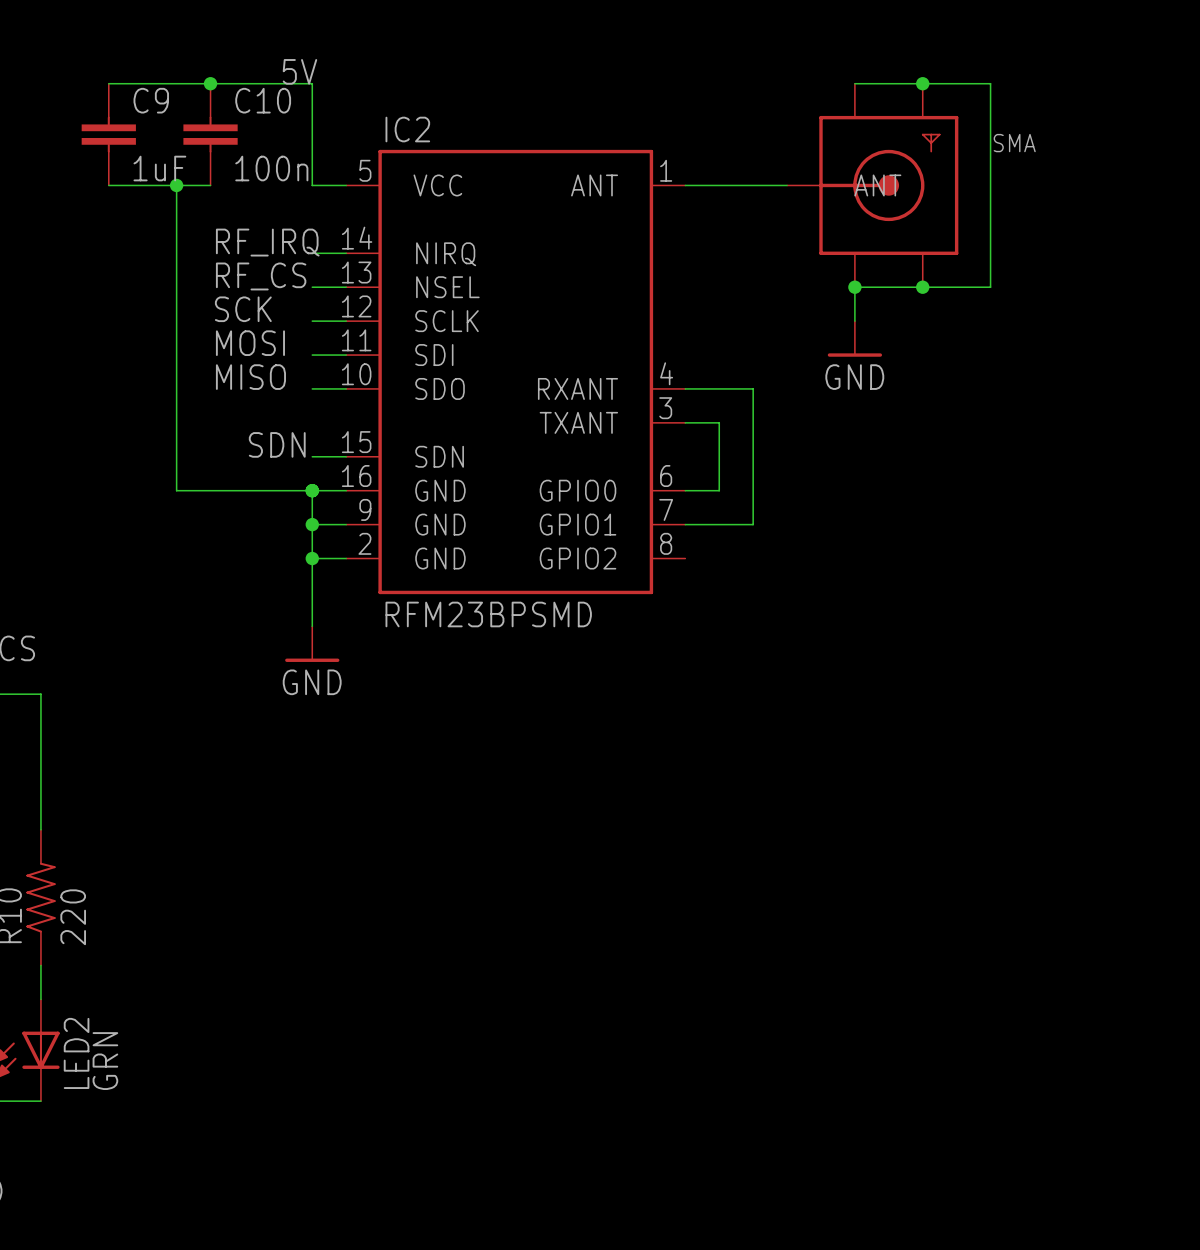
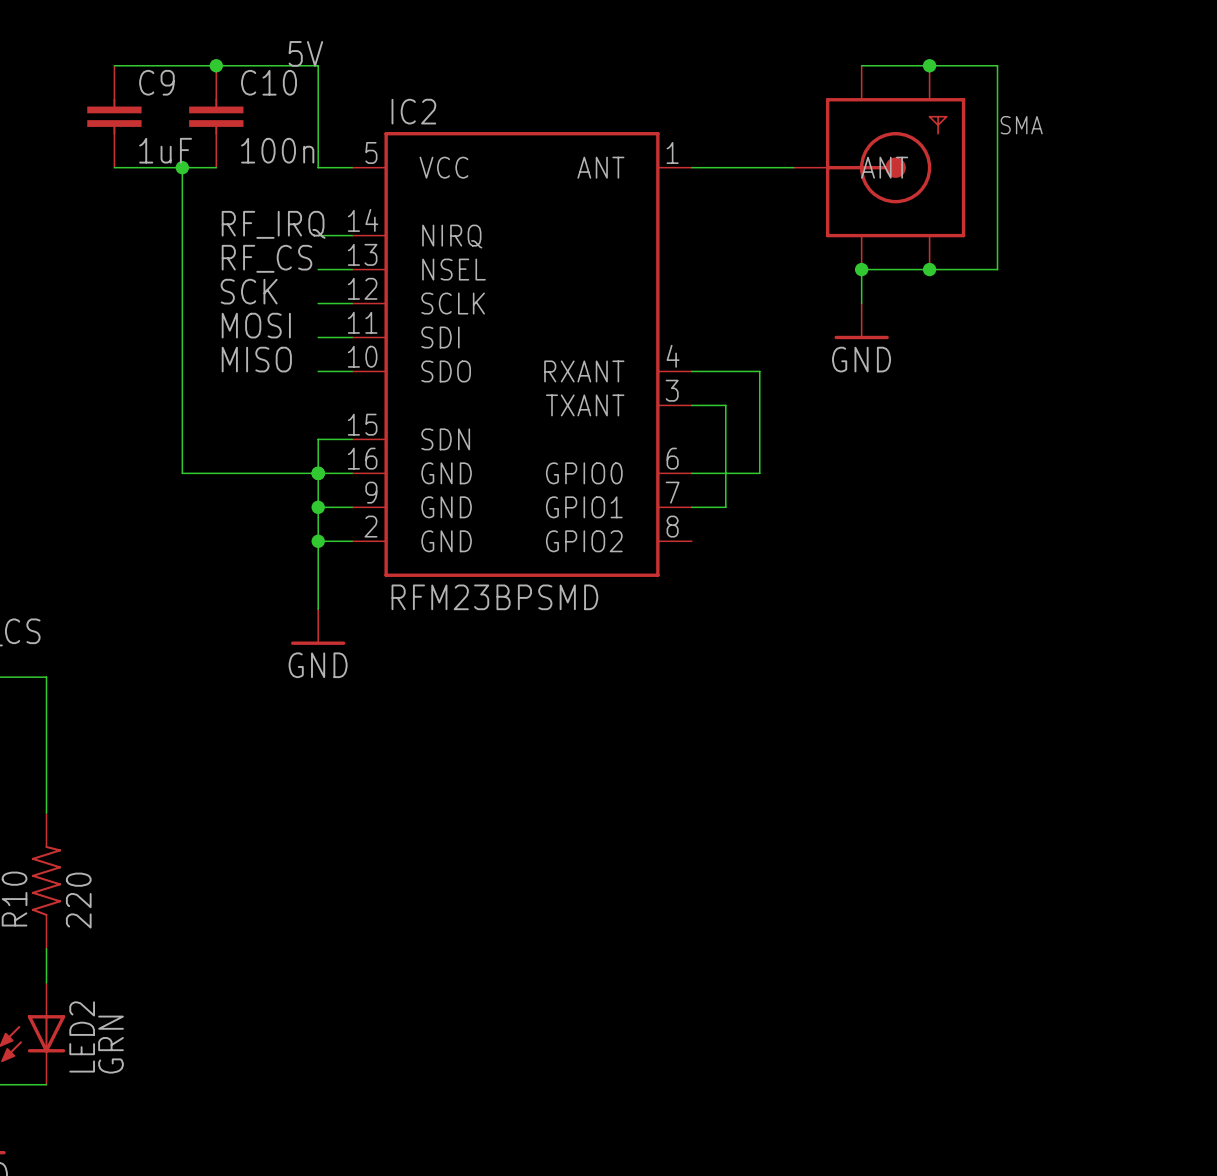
label: SDN (277, 444) -> none
wire: none -> (318, 439) (318, 473)
wire: (753, 490) (753, 524) (719, 524) -> (759, 473) (725, 473) (725, 507)

